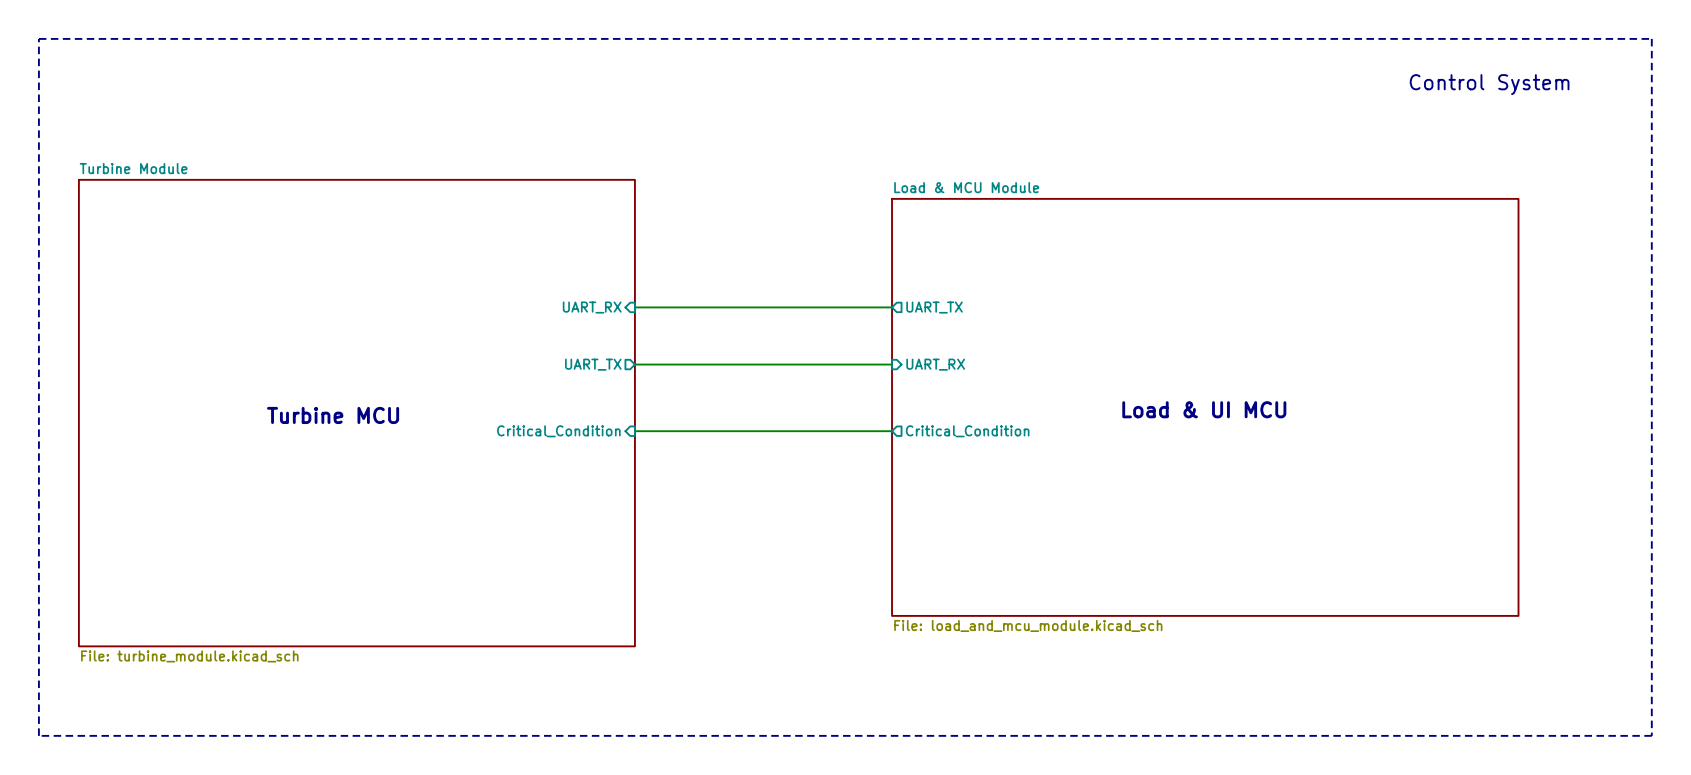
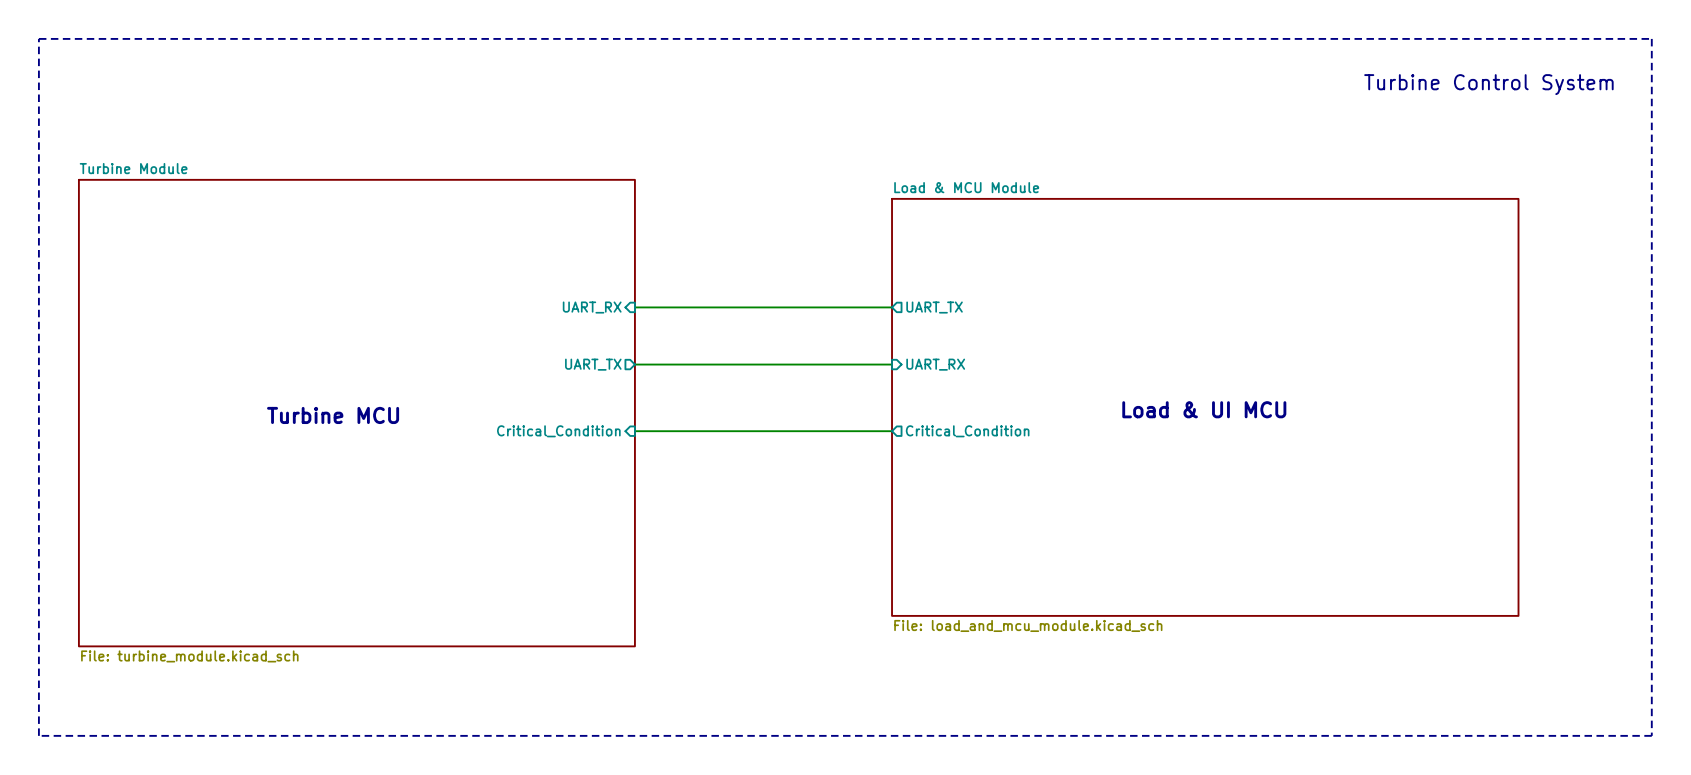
text: Control System (1489, 84) -> Turbine Control System (1488, 84)

